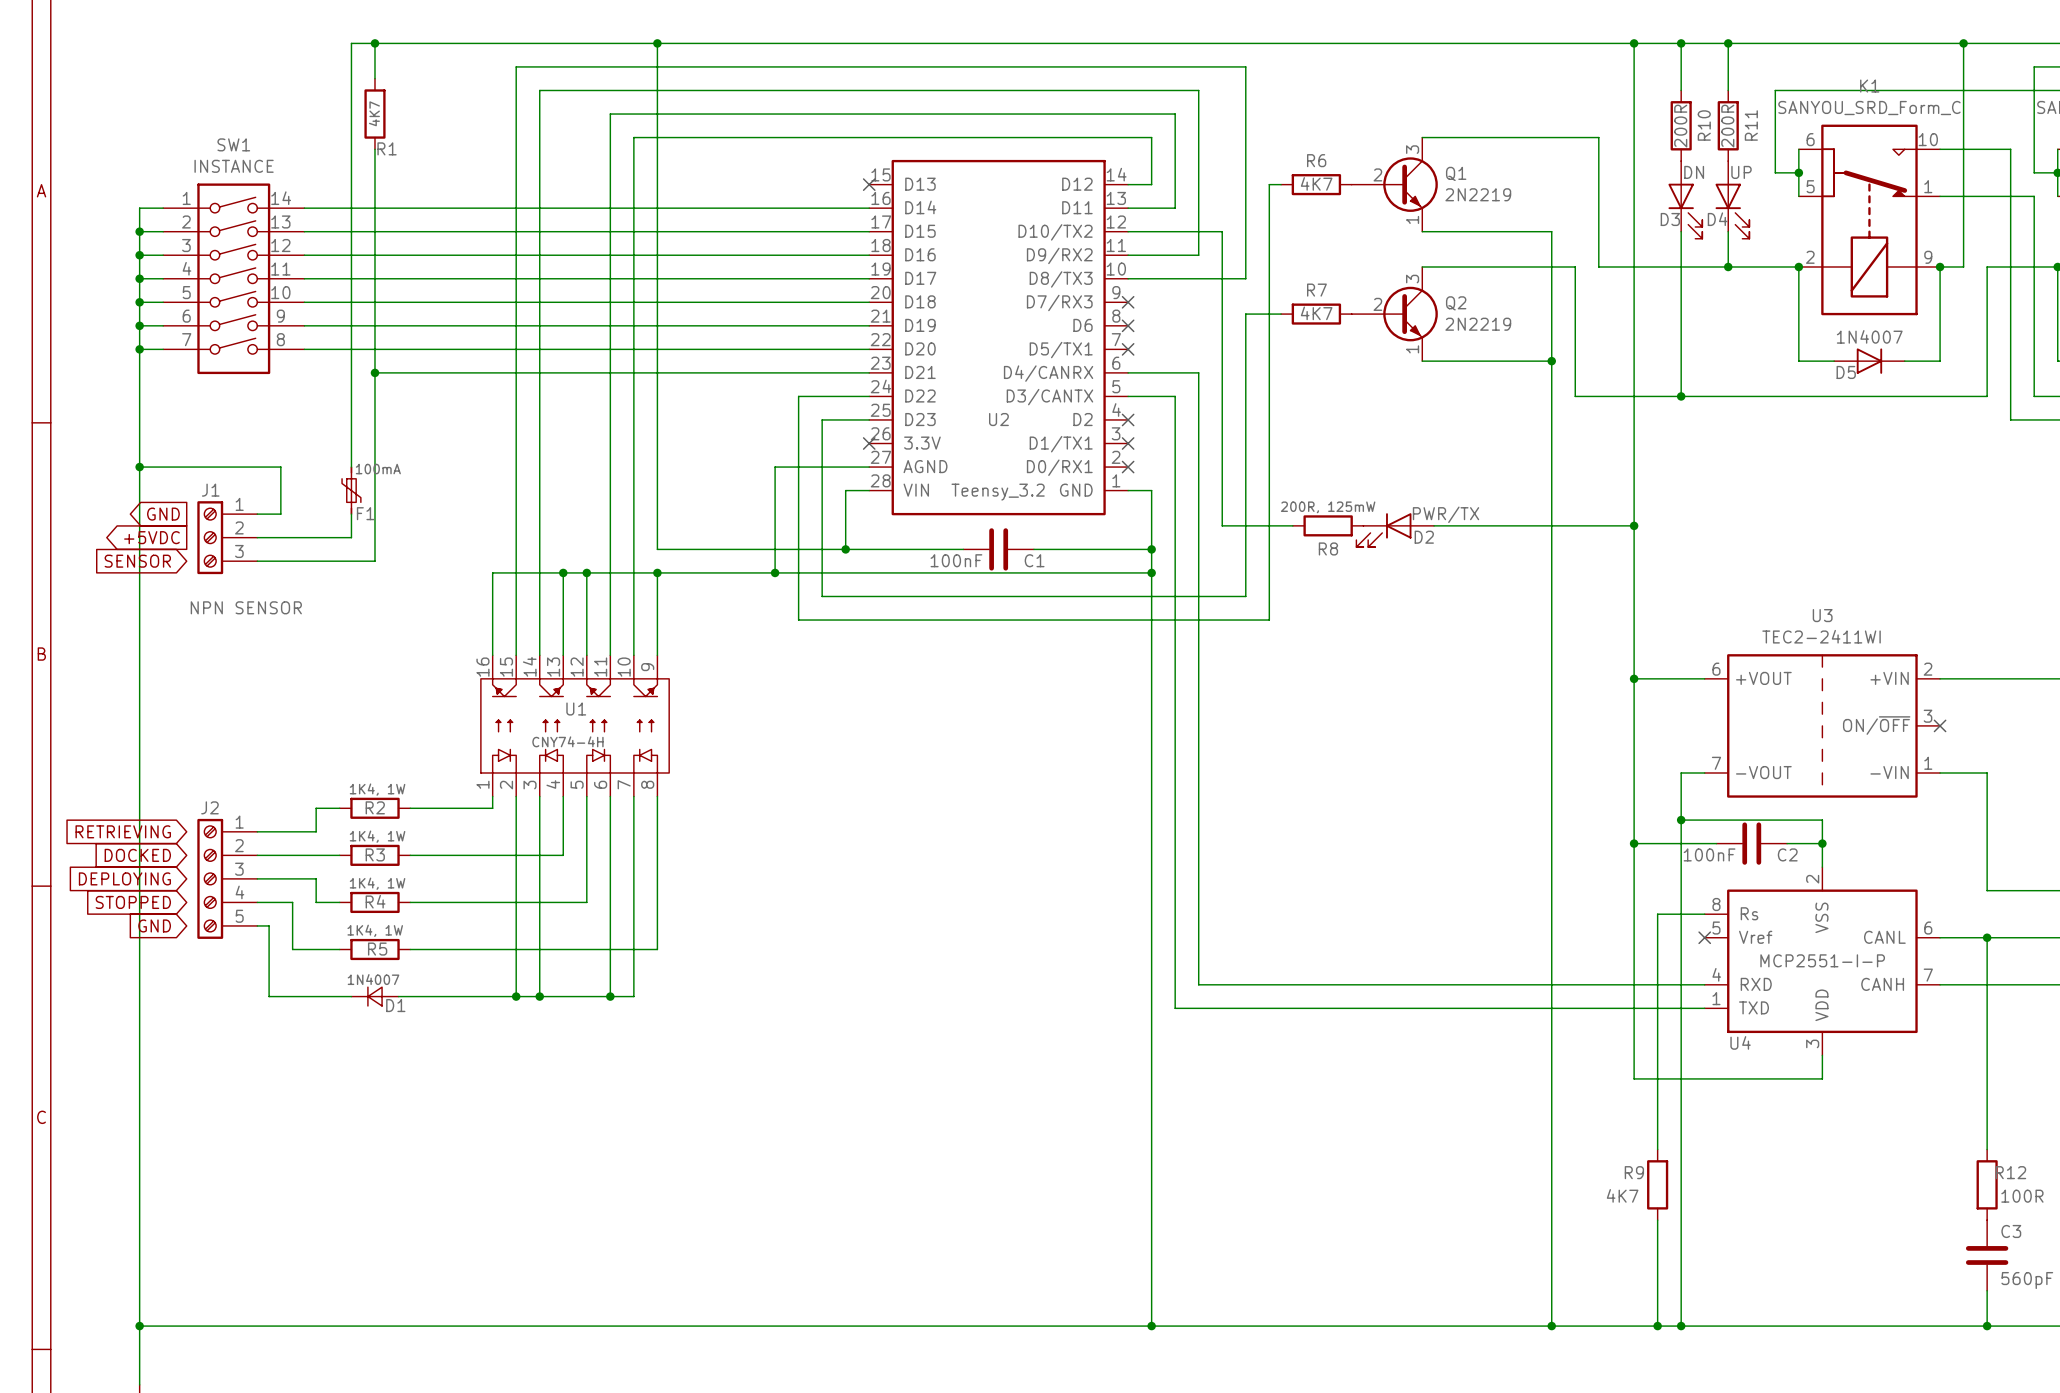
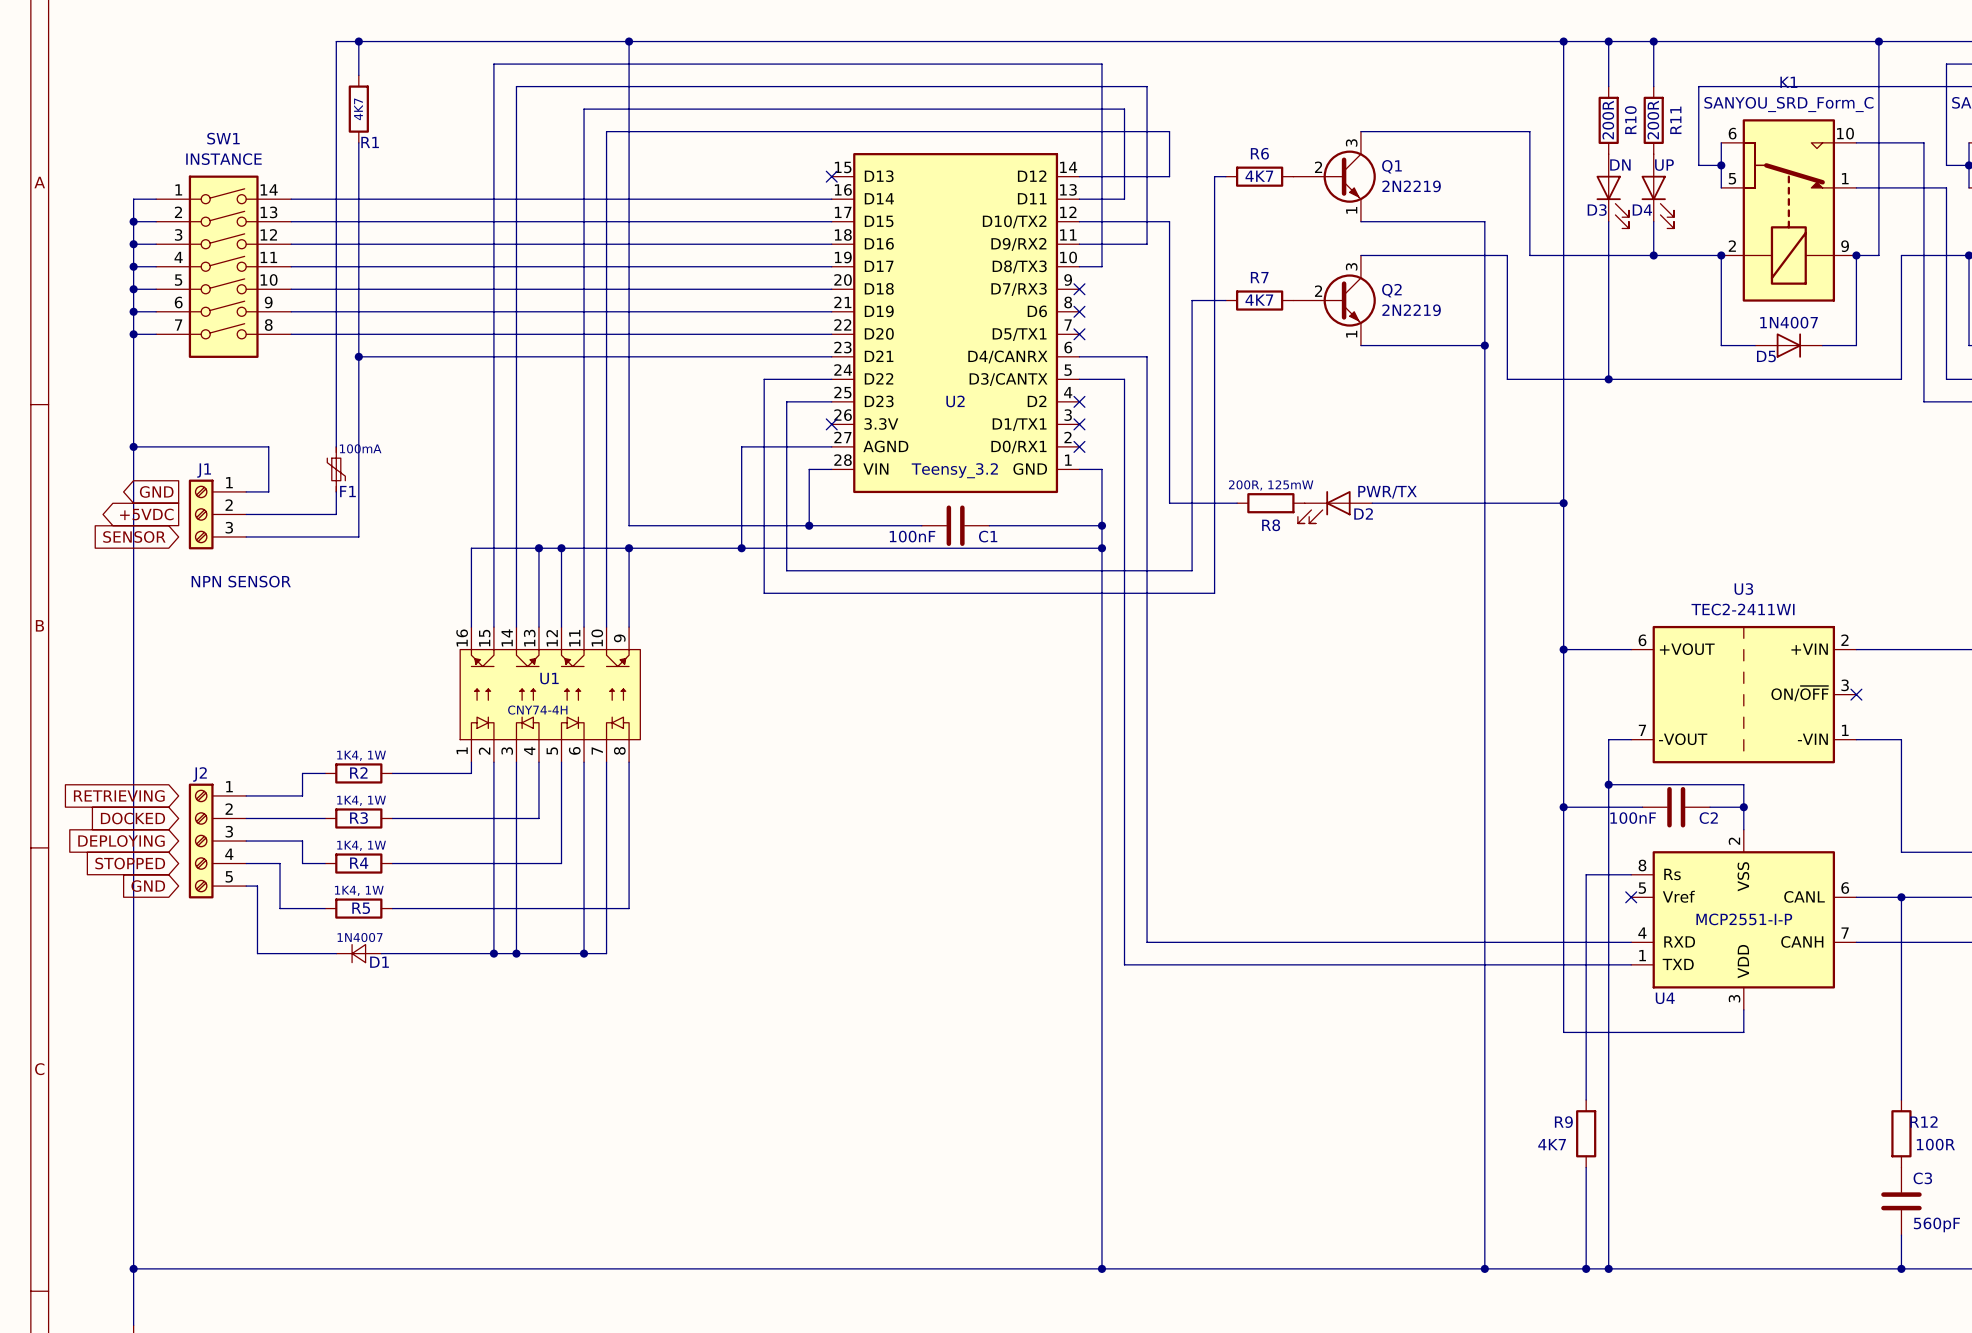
wire: (1151, 66) (1245, 66) (1245, 278) (1151, 278) -> (1101, 64) (1101, 131) (1169, 131) (1169, 176) (1101, 176) (1101, 266)

